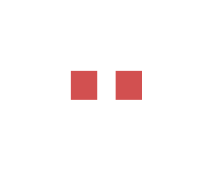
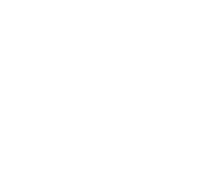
part: (106, 85) -> none

